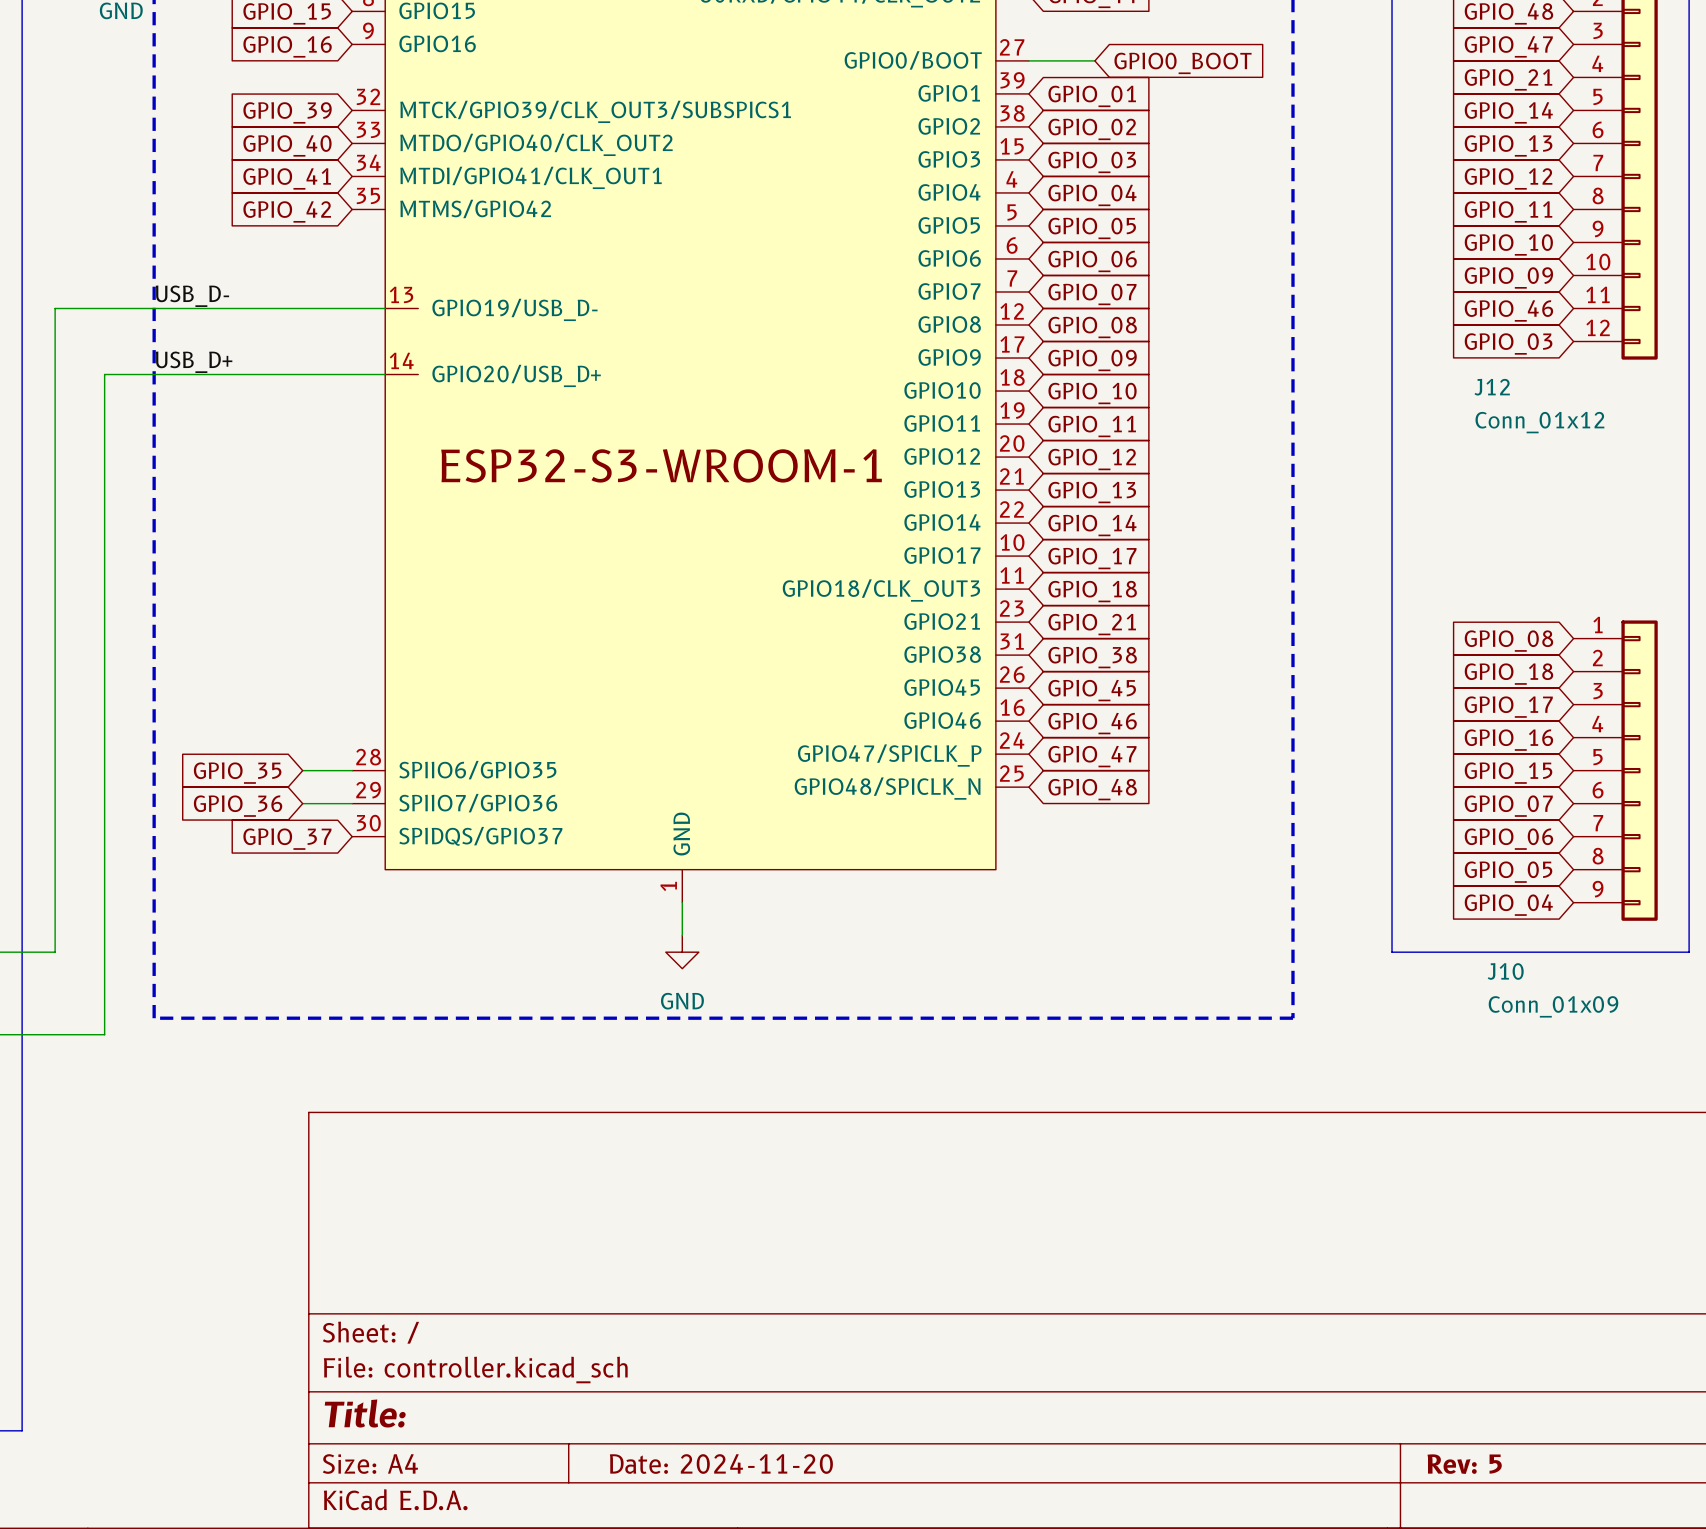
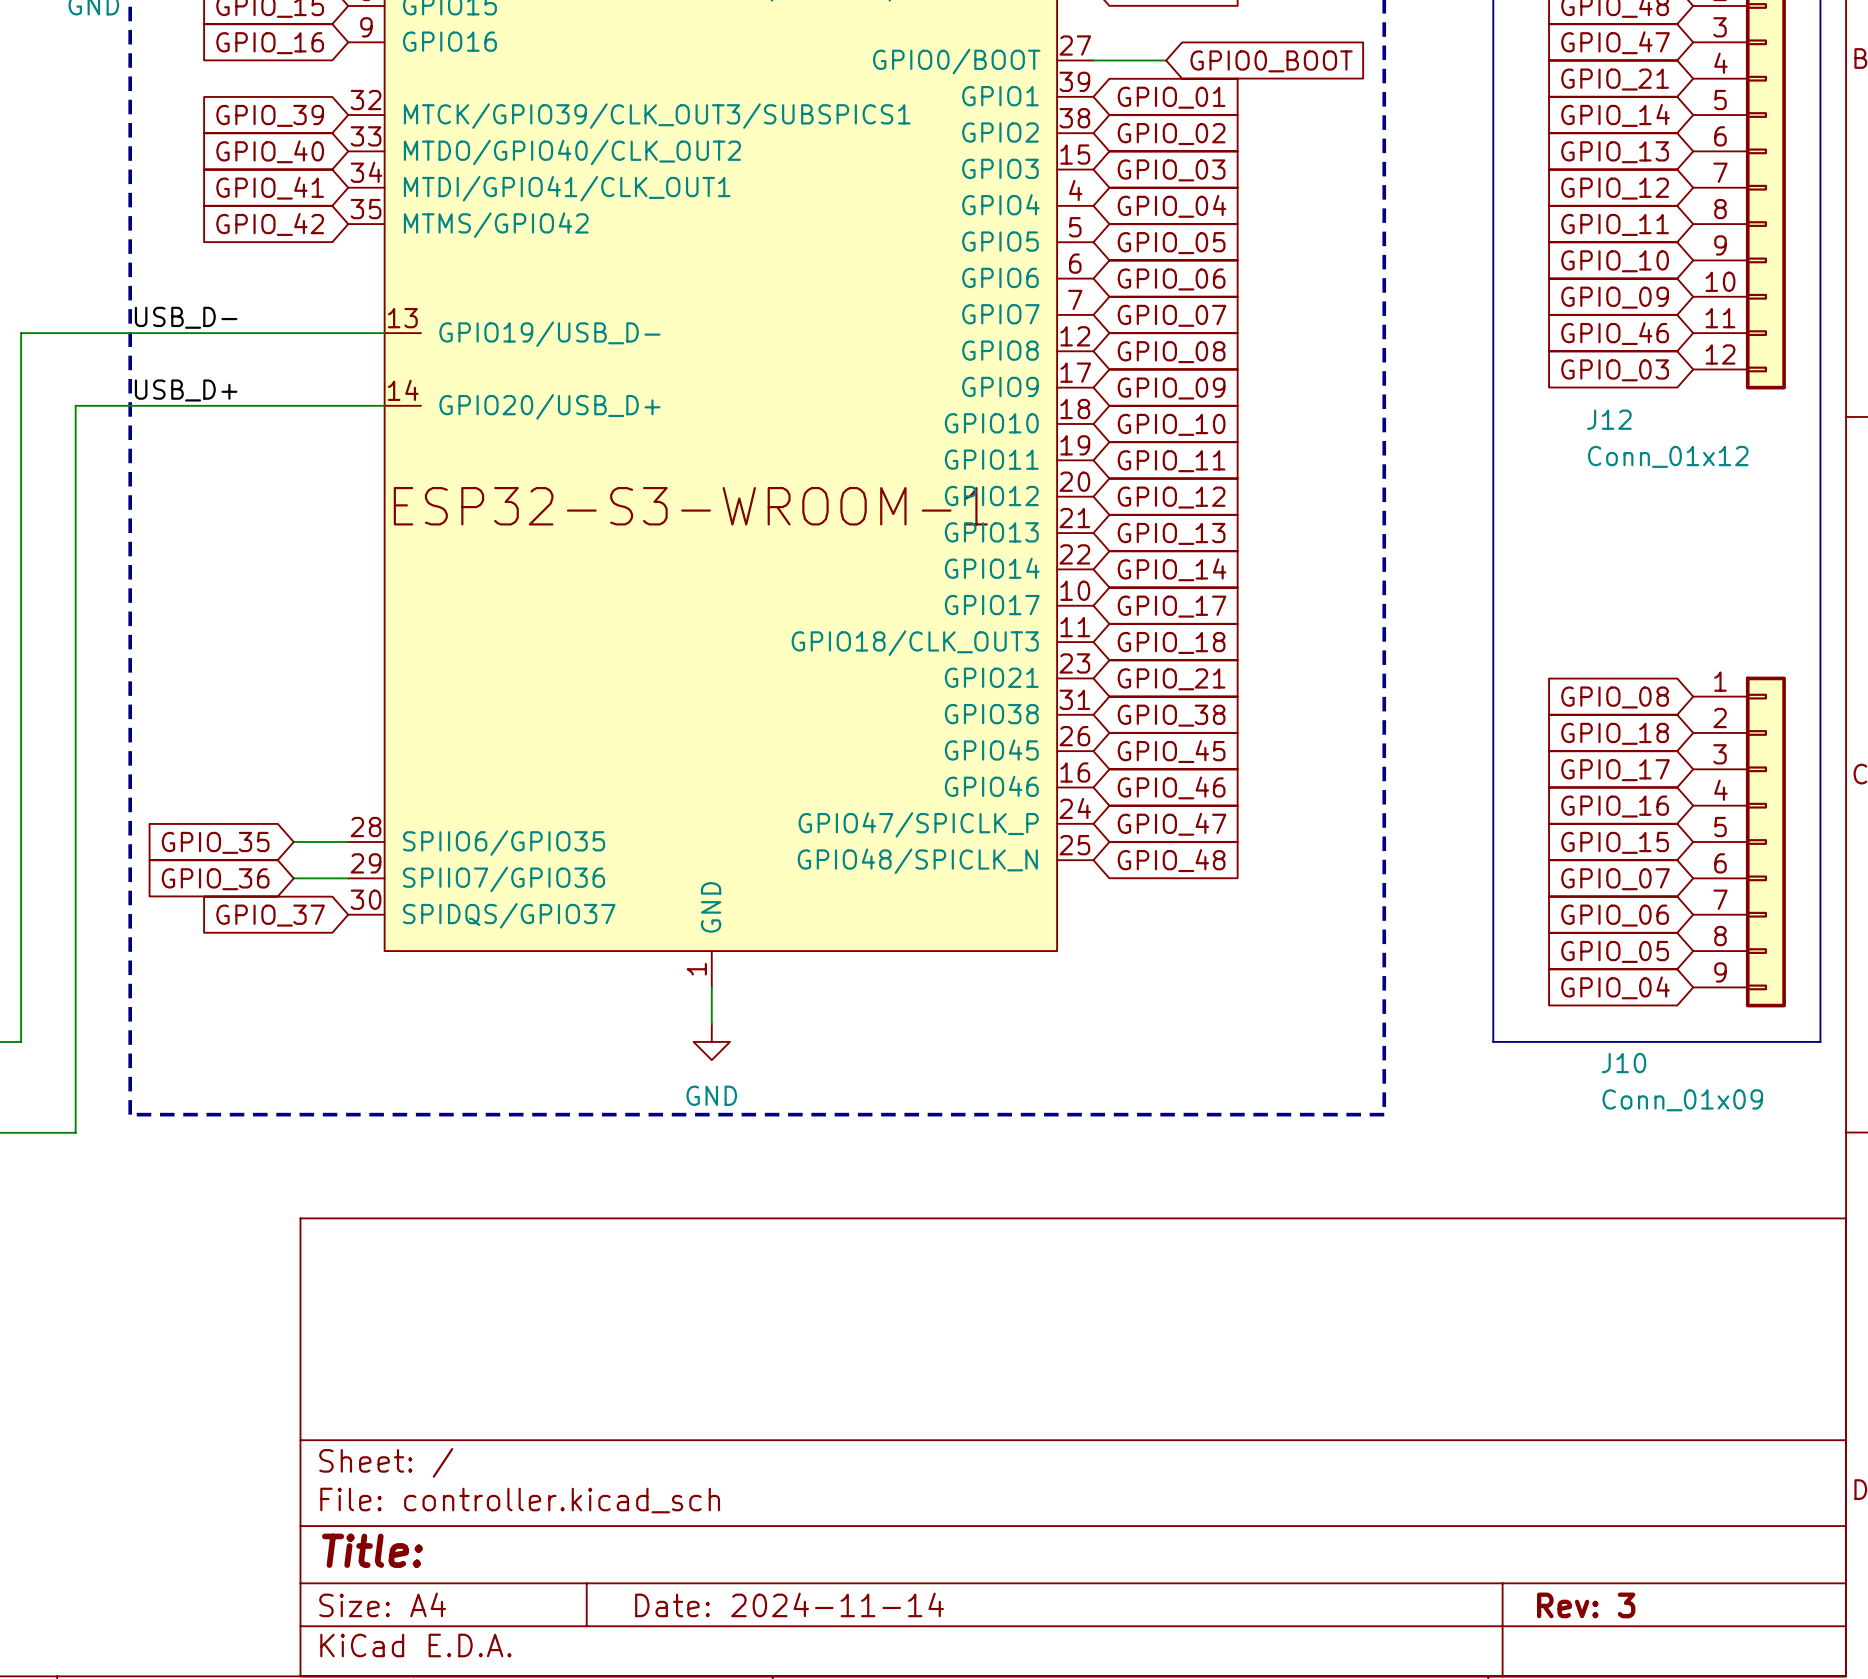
title block: Date: 2024-11-20 (721, 1463) -> Date: 2024-11-14 (789, 1604)
title block: Rev: 5 (1464, 1464) -> Rev: 3 (1586, 1605)

